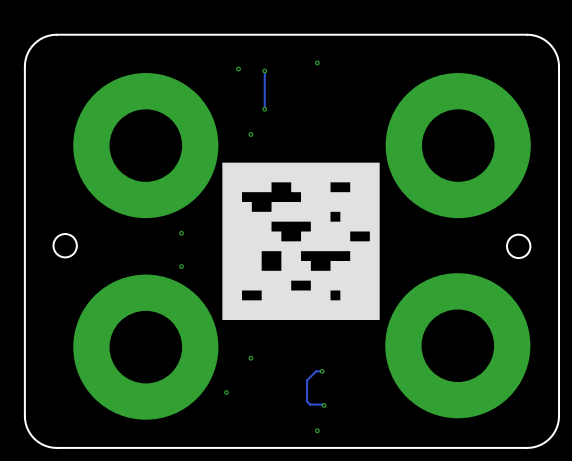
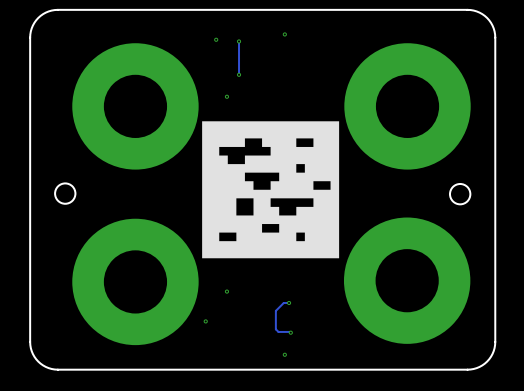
via: (181, 233) -> none
via: (181, 266) -> none

